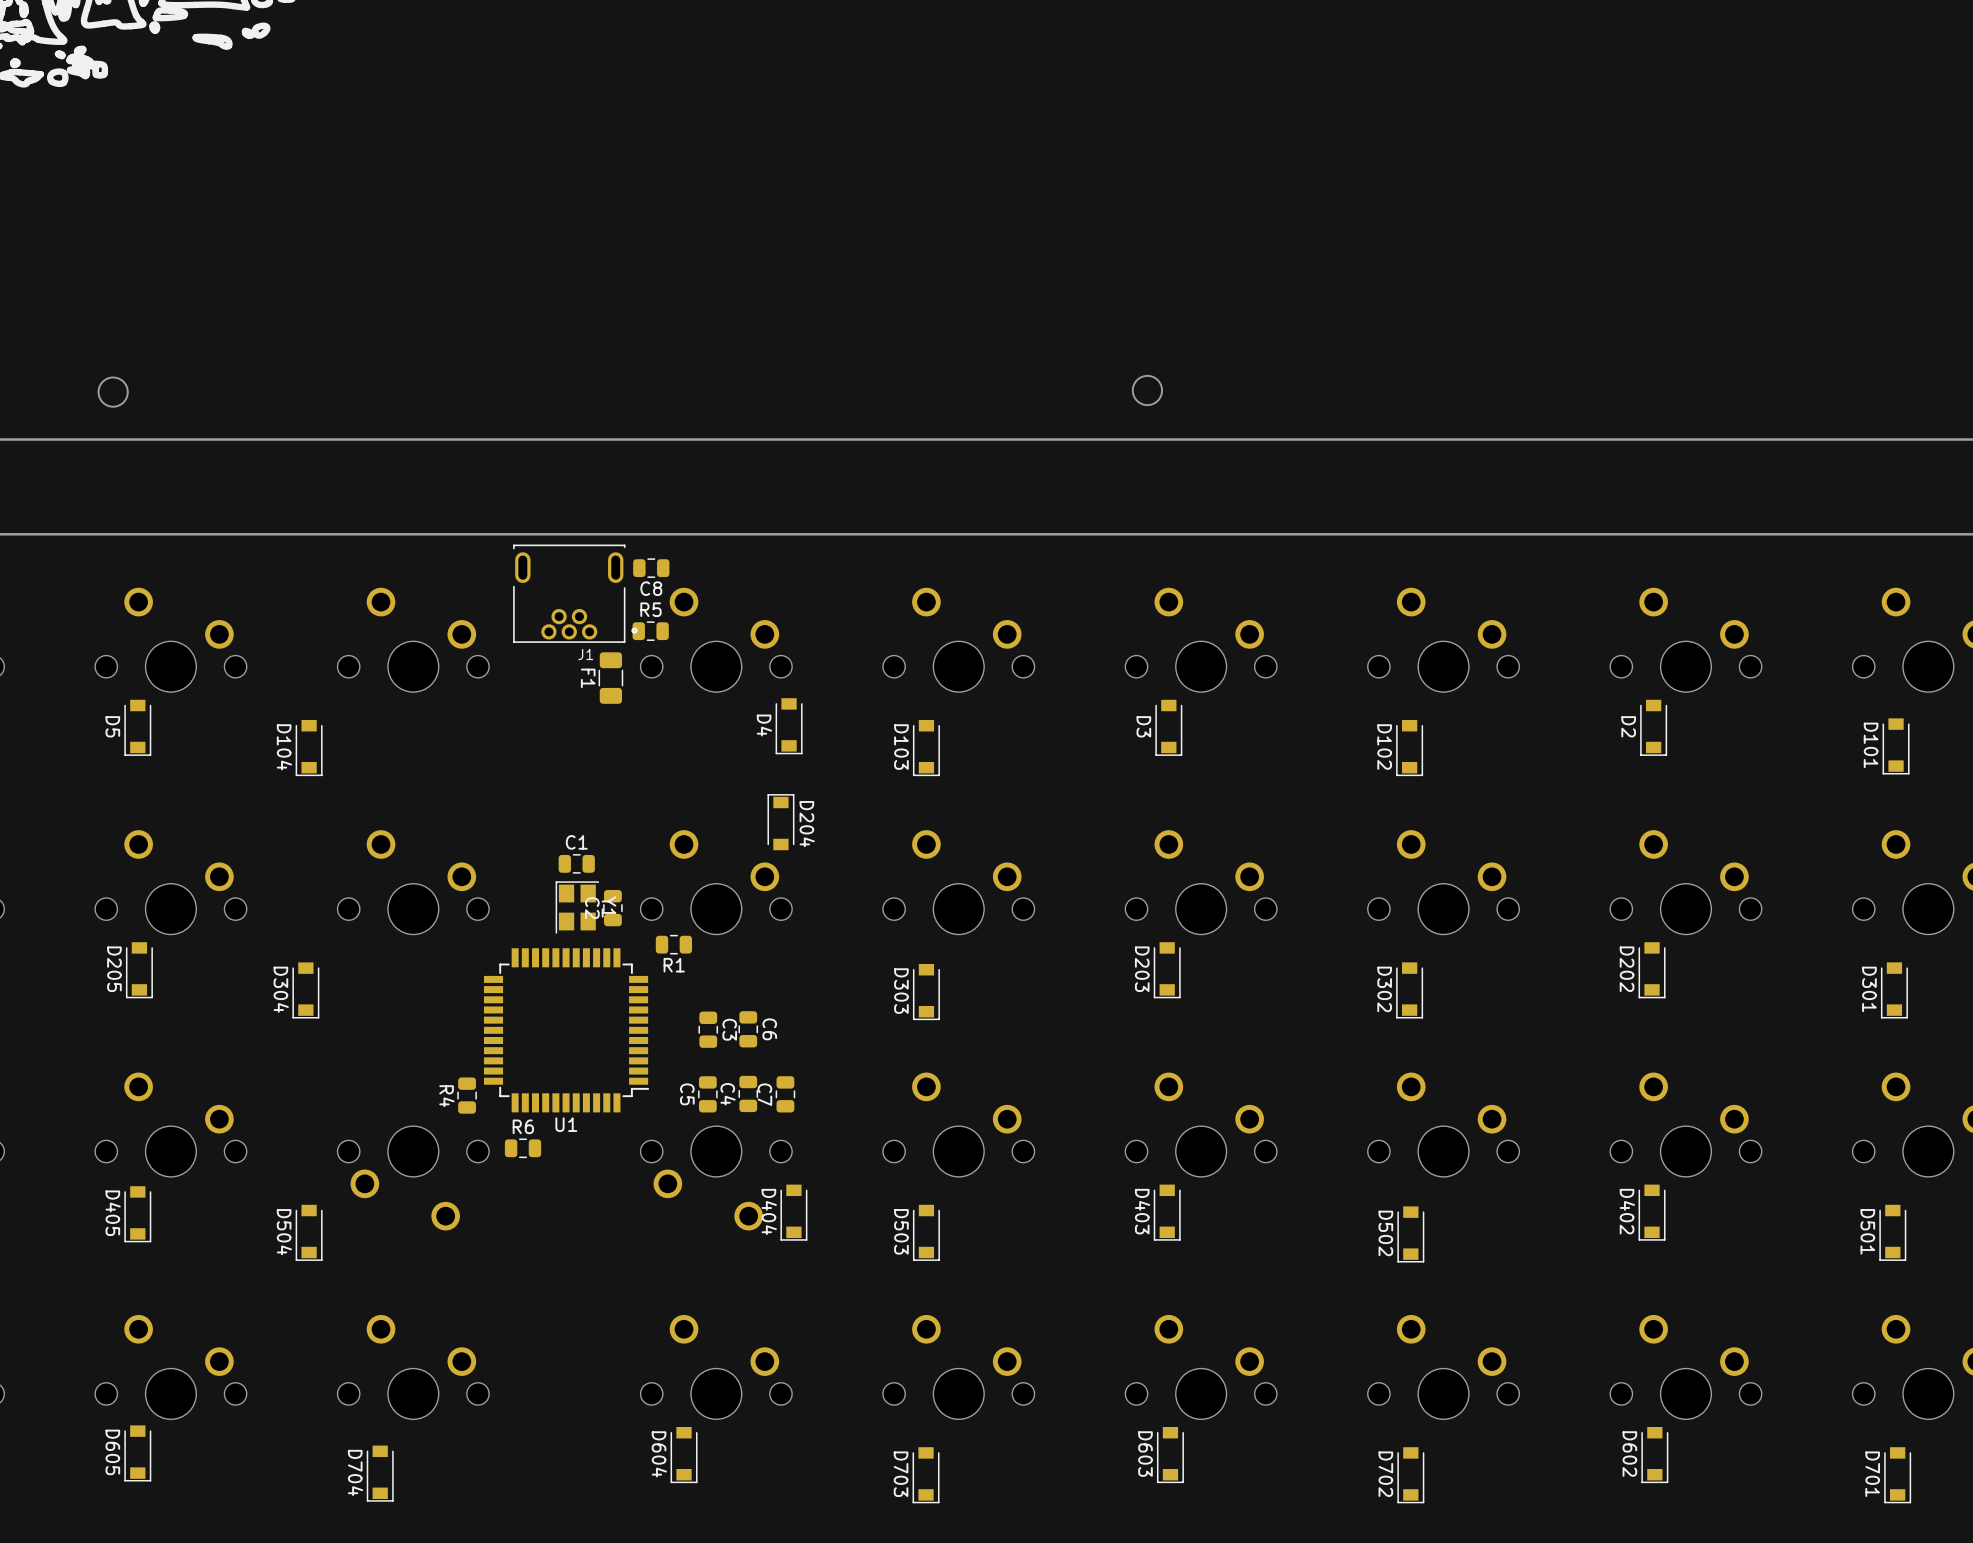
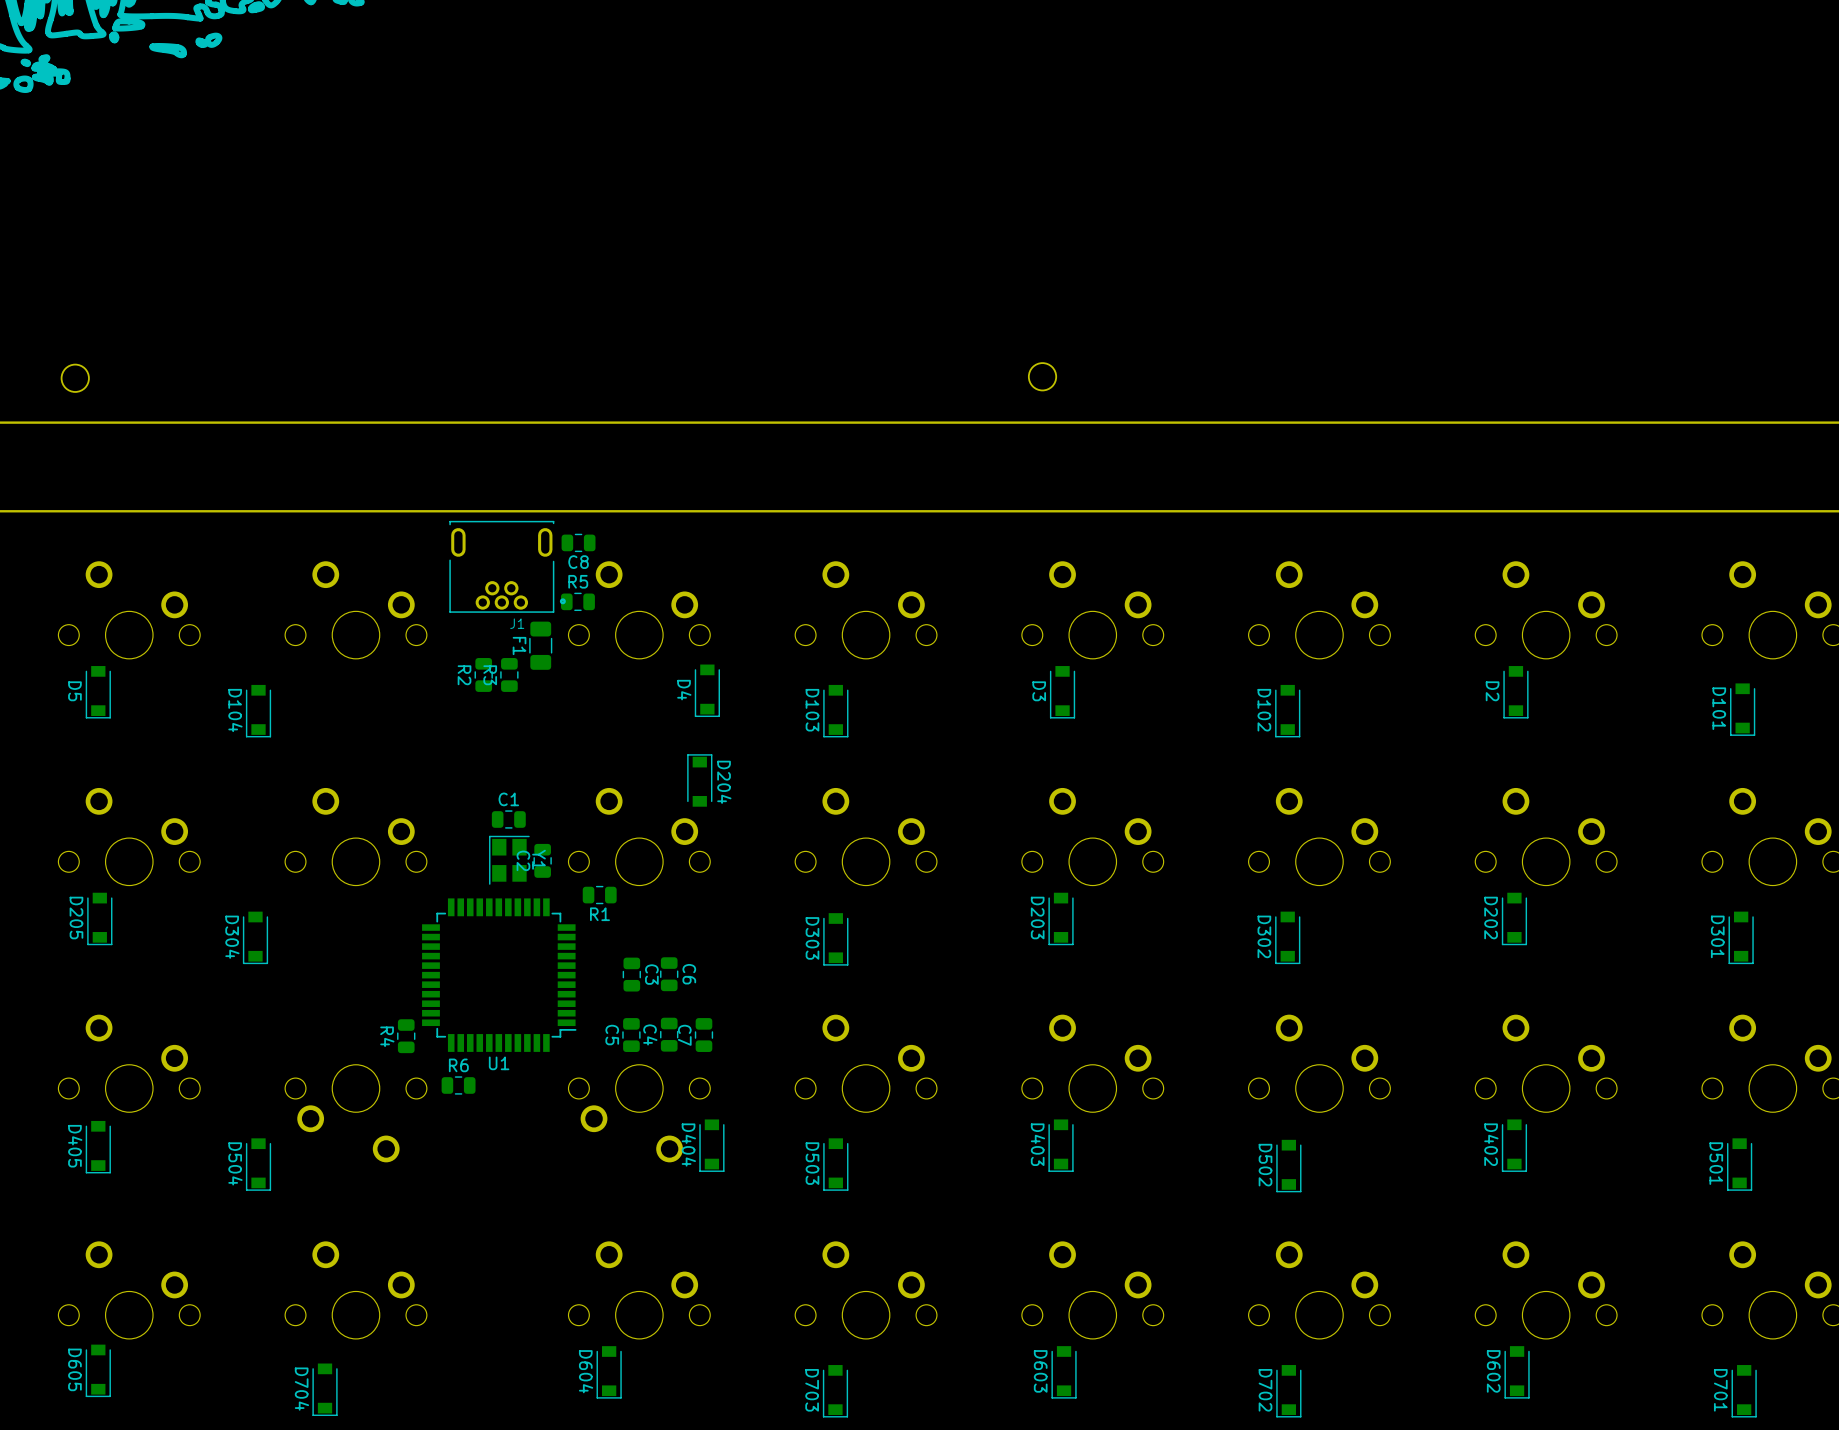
R2: none -> (483, 674)
R3: none -> (509, 674)

